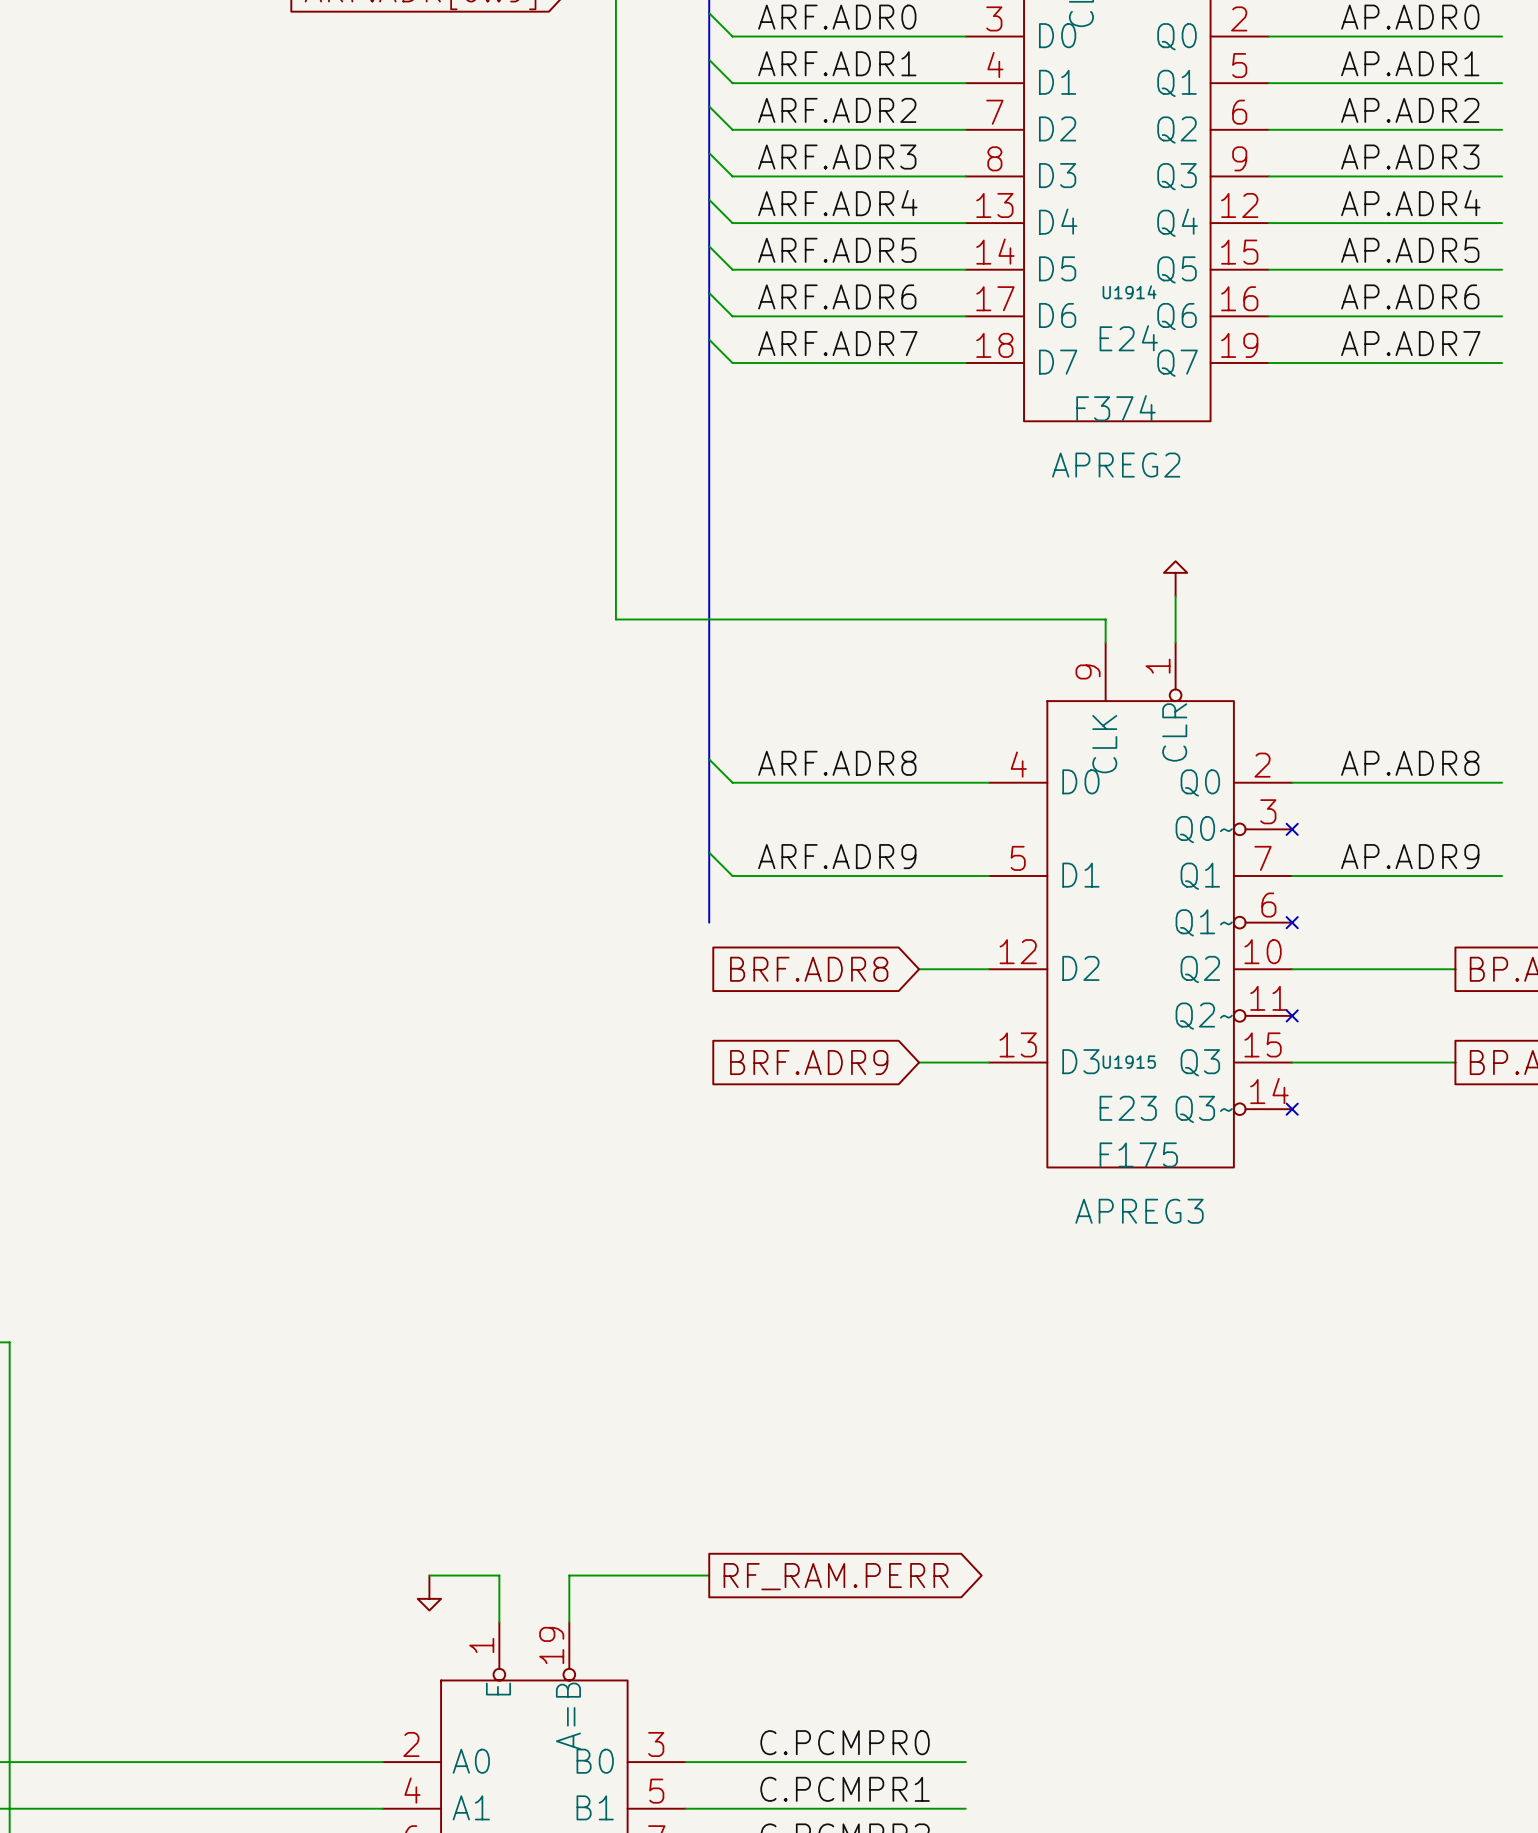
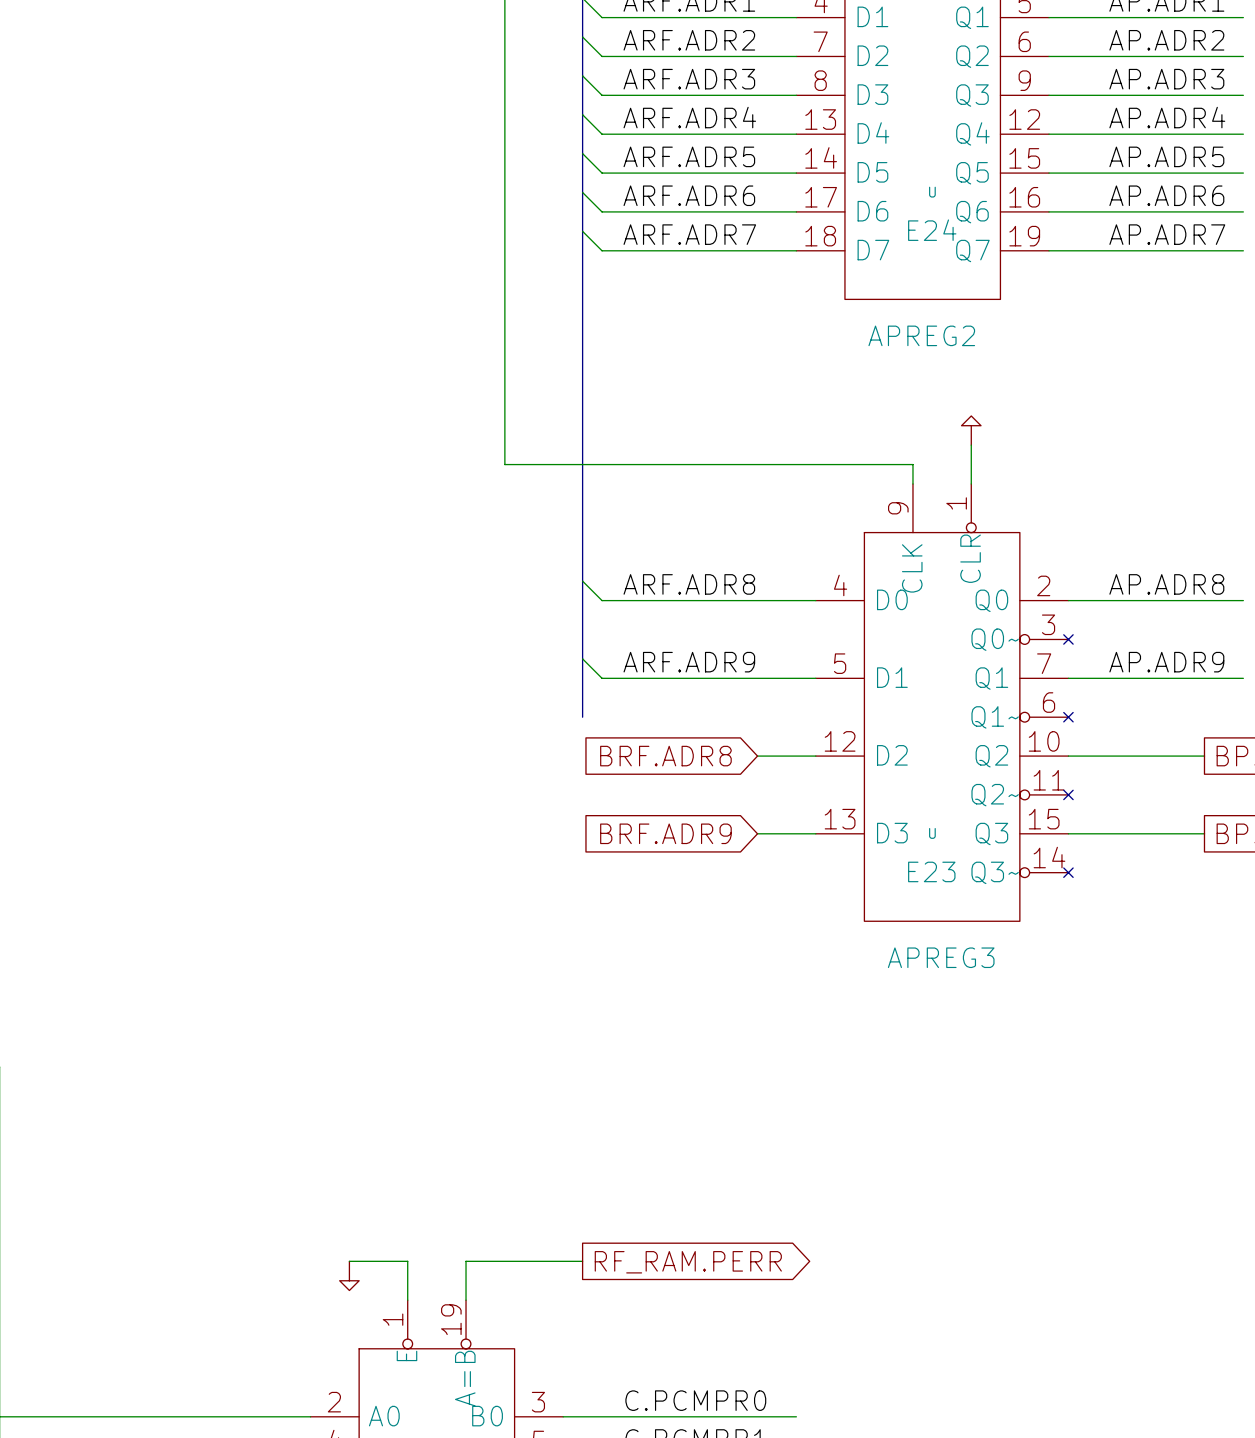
U1914 name: U1914 (1129, 292) -> U (932, 192)
U1914 value: F374 (1116, 408) -> none
U1915 name: U1915 (1129, 1062) -> U (932, 833)
U1915 value: F175 (1138, 1154) -> none

